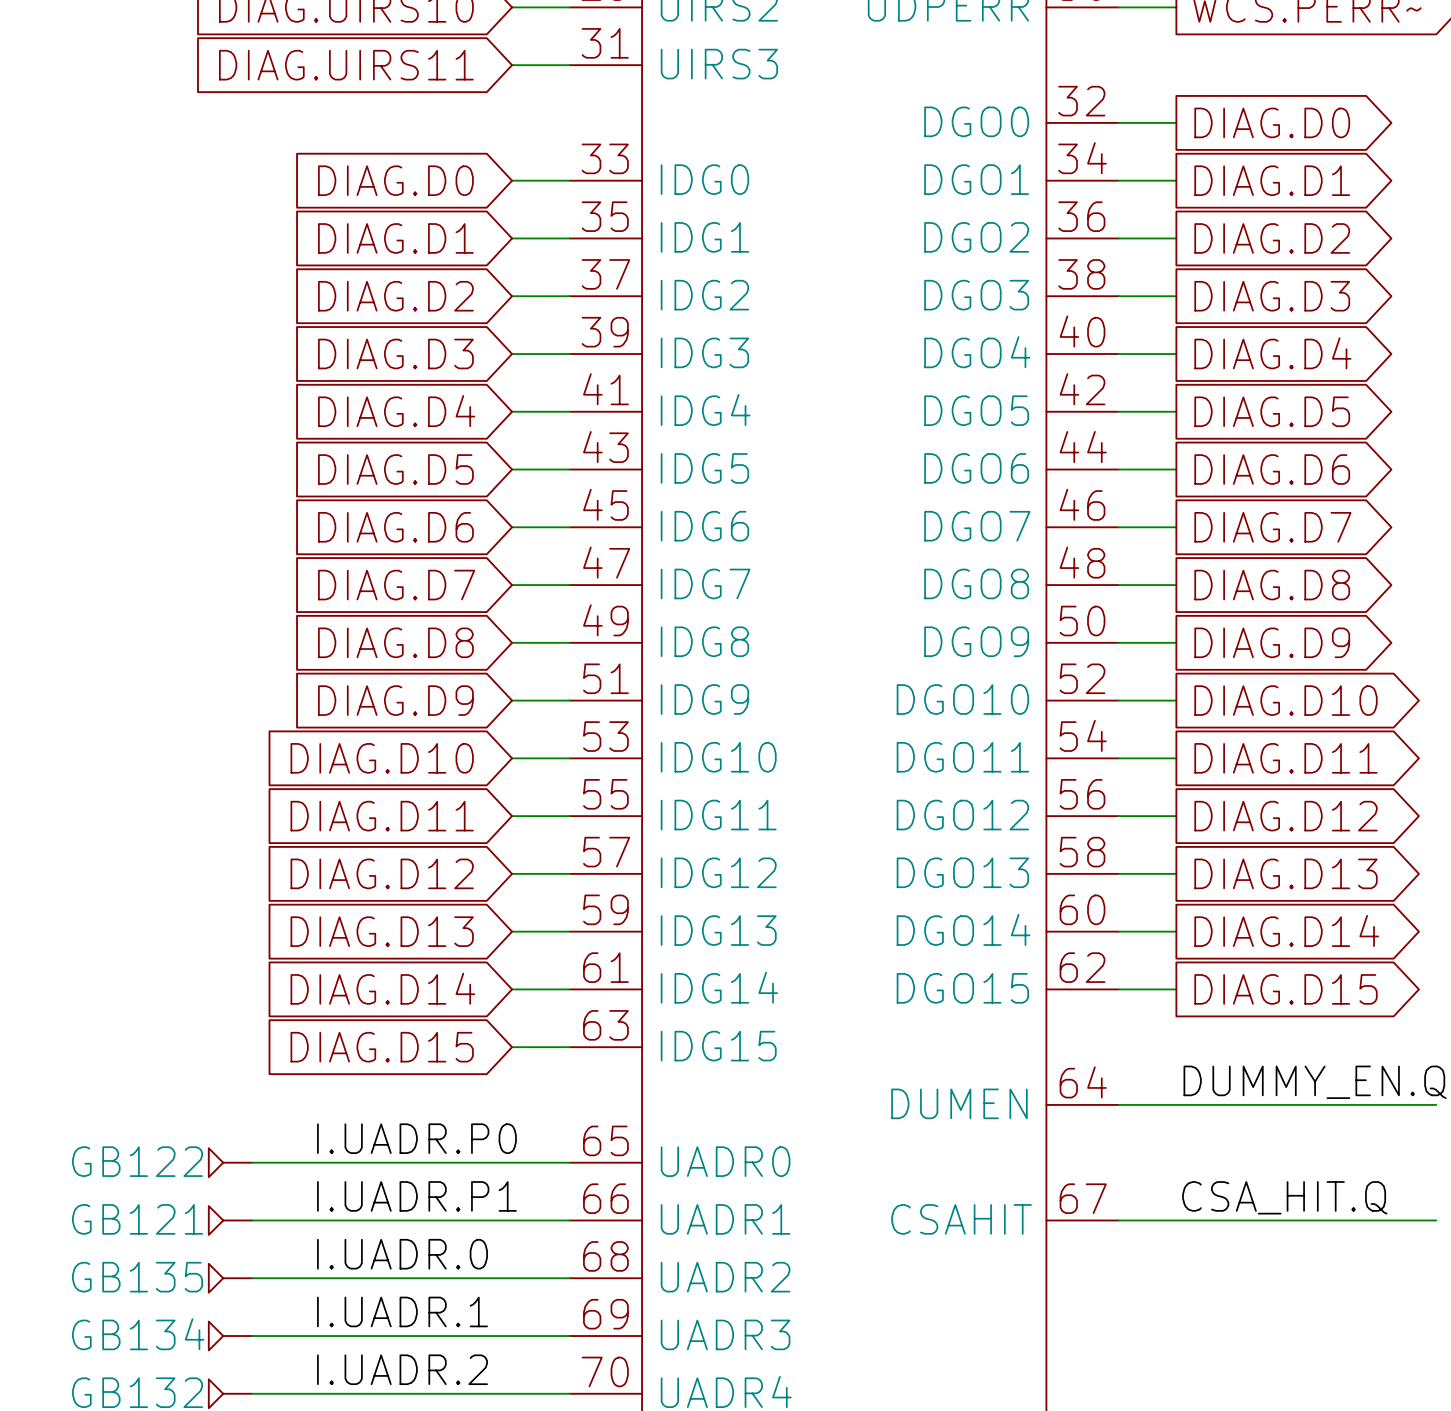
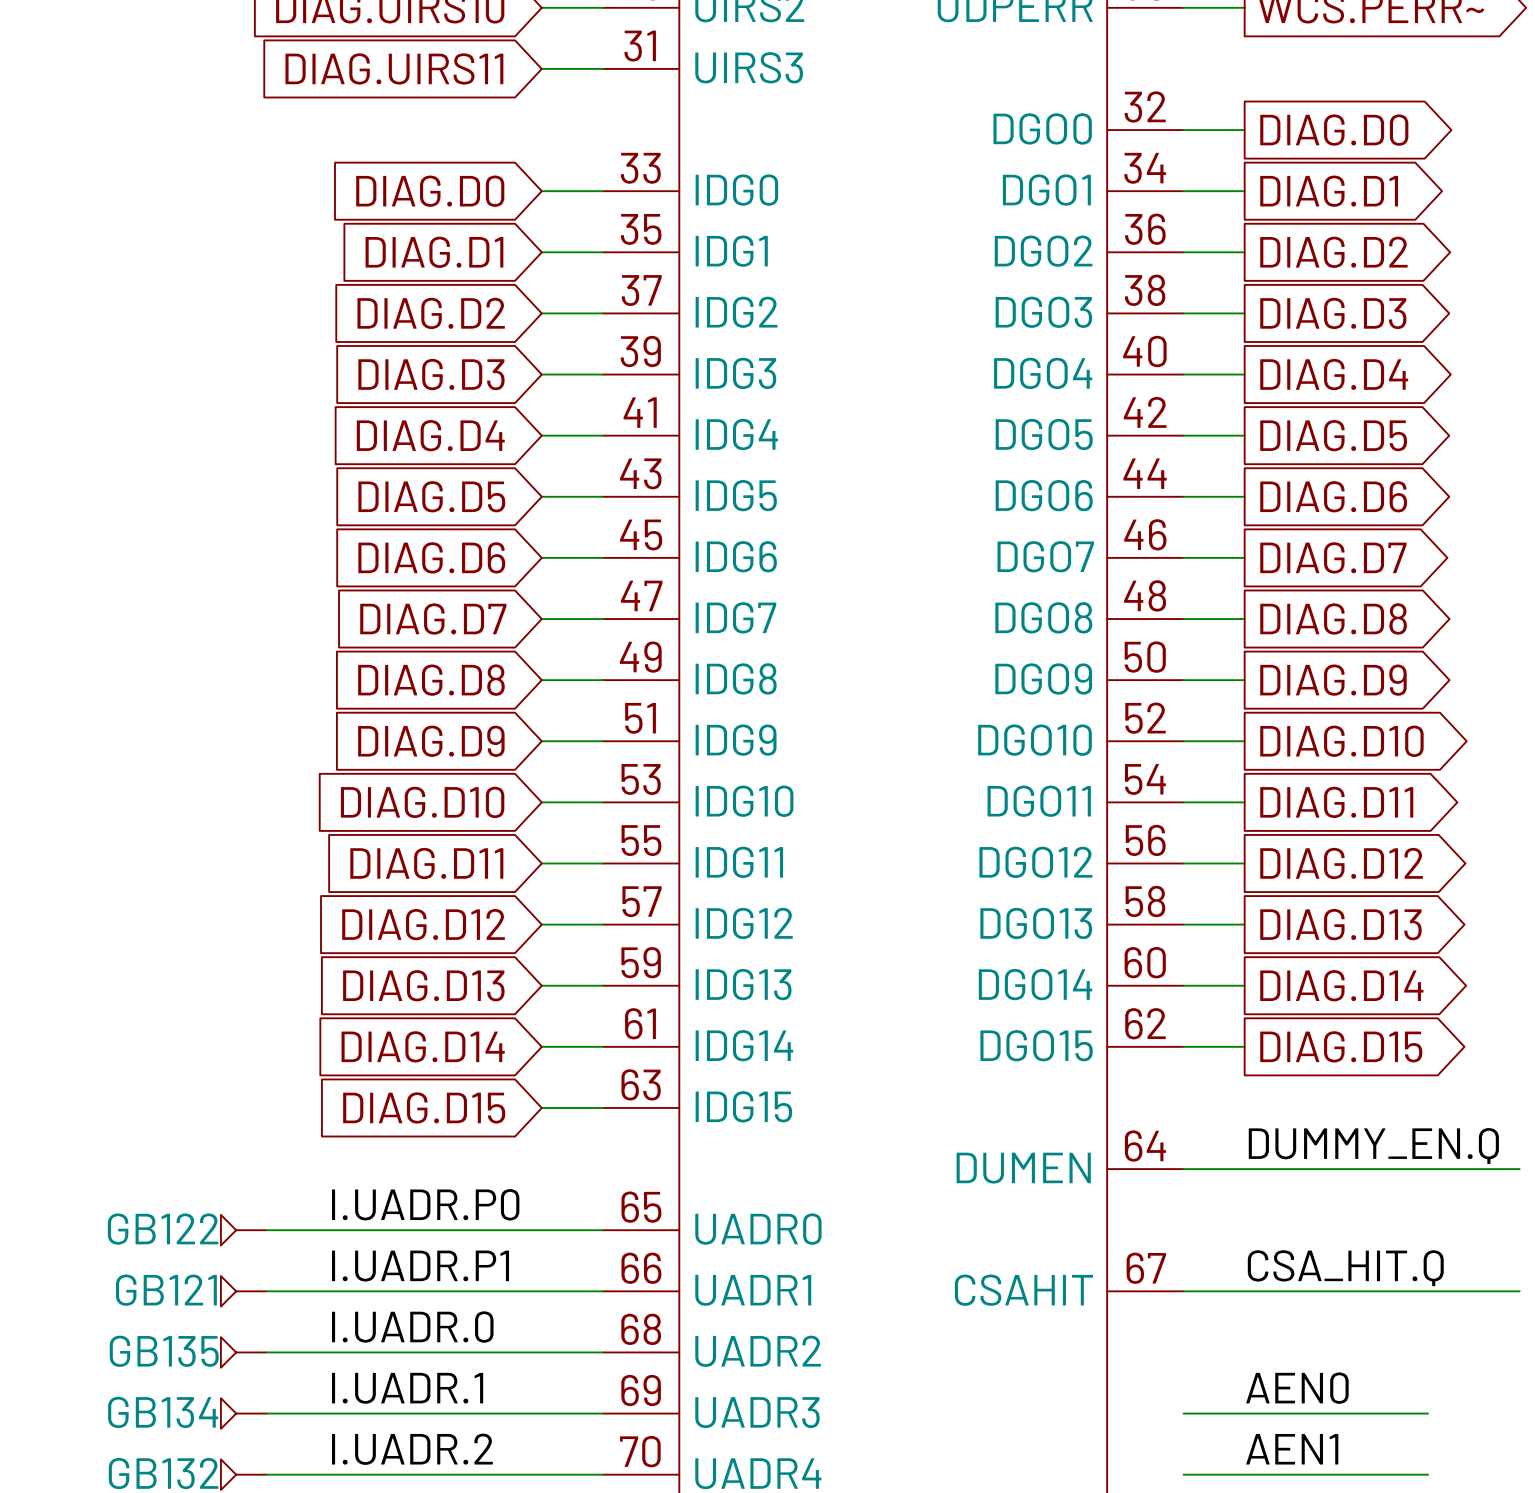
label: none -> AEN0 (1297, 1388)
wire: none -> (1183, 1413) (1428, 1413)
label: none -> AEN1 (1292, 1449)
wire: none -> (1183, 1474) (1428, 1474)

